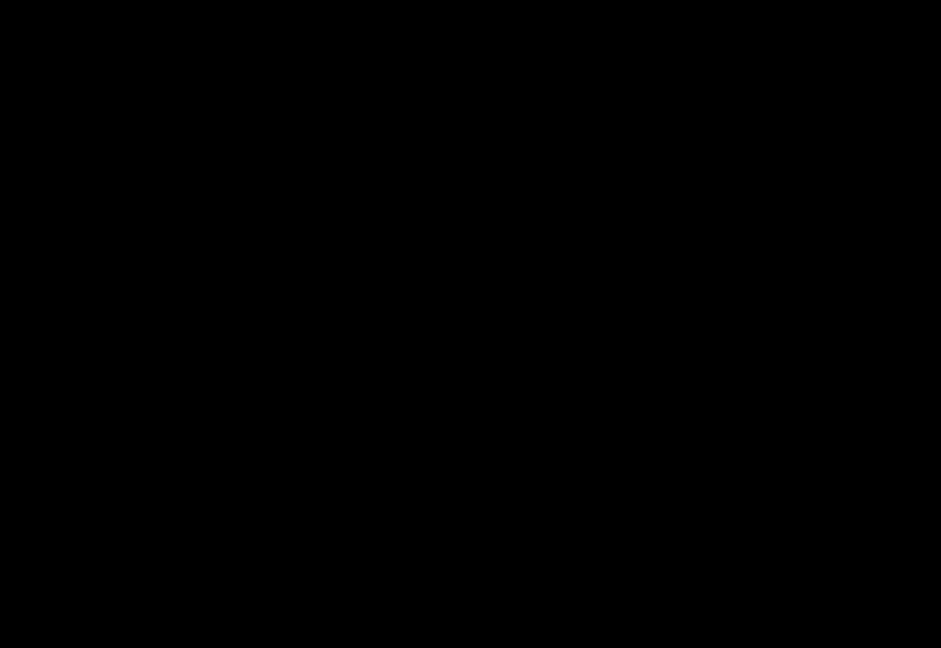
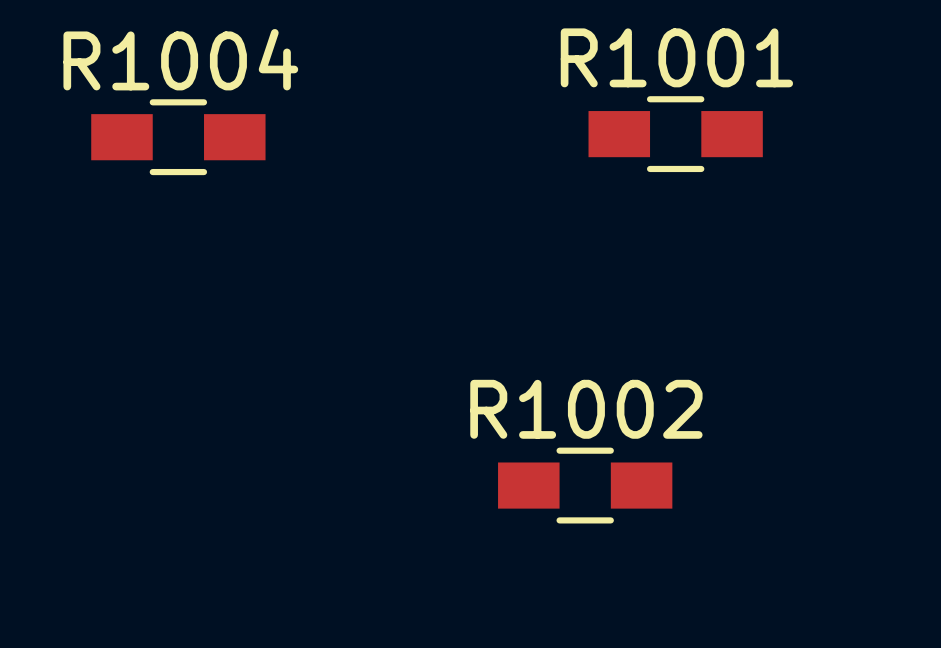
R1001: none -> (675, 134)
R1004: none -> (178, 137)
R1002: none -> (585, 485)

